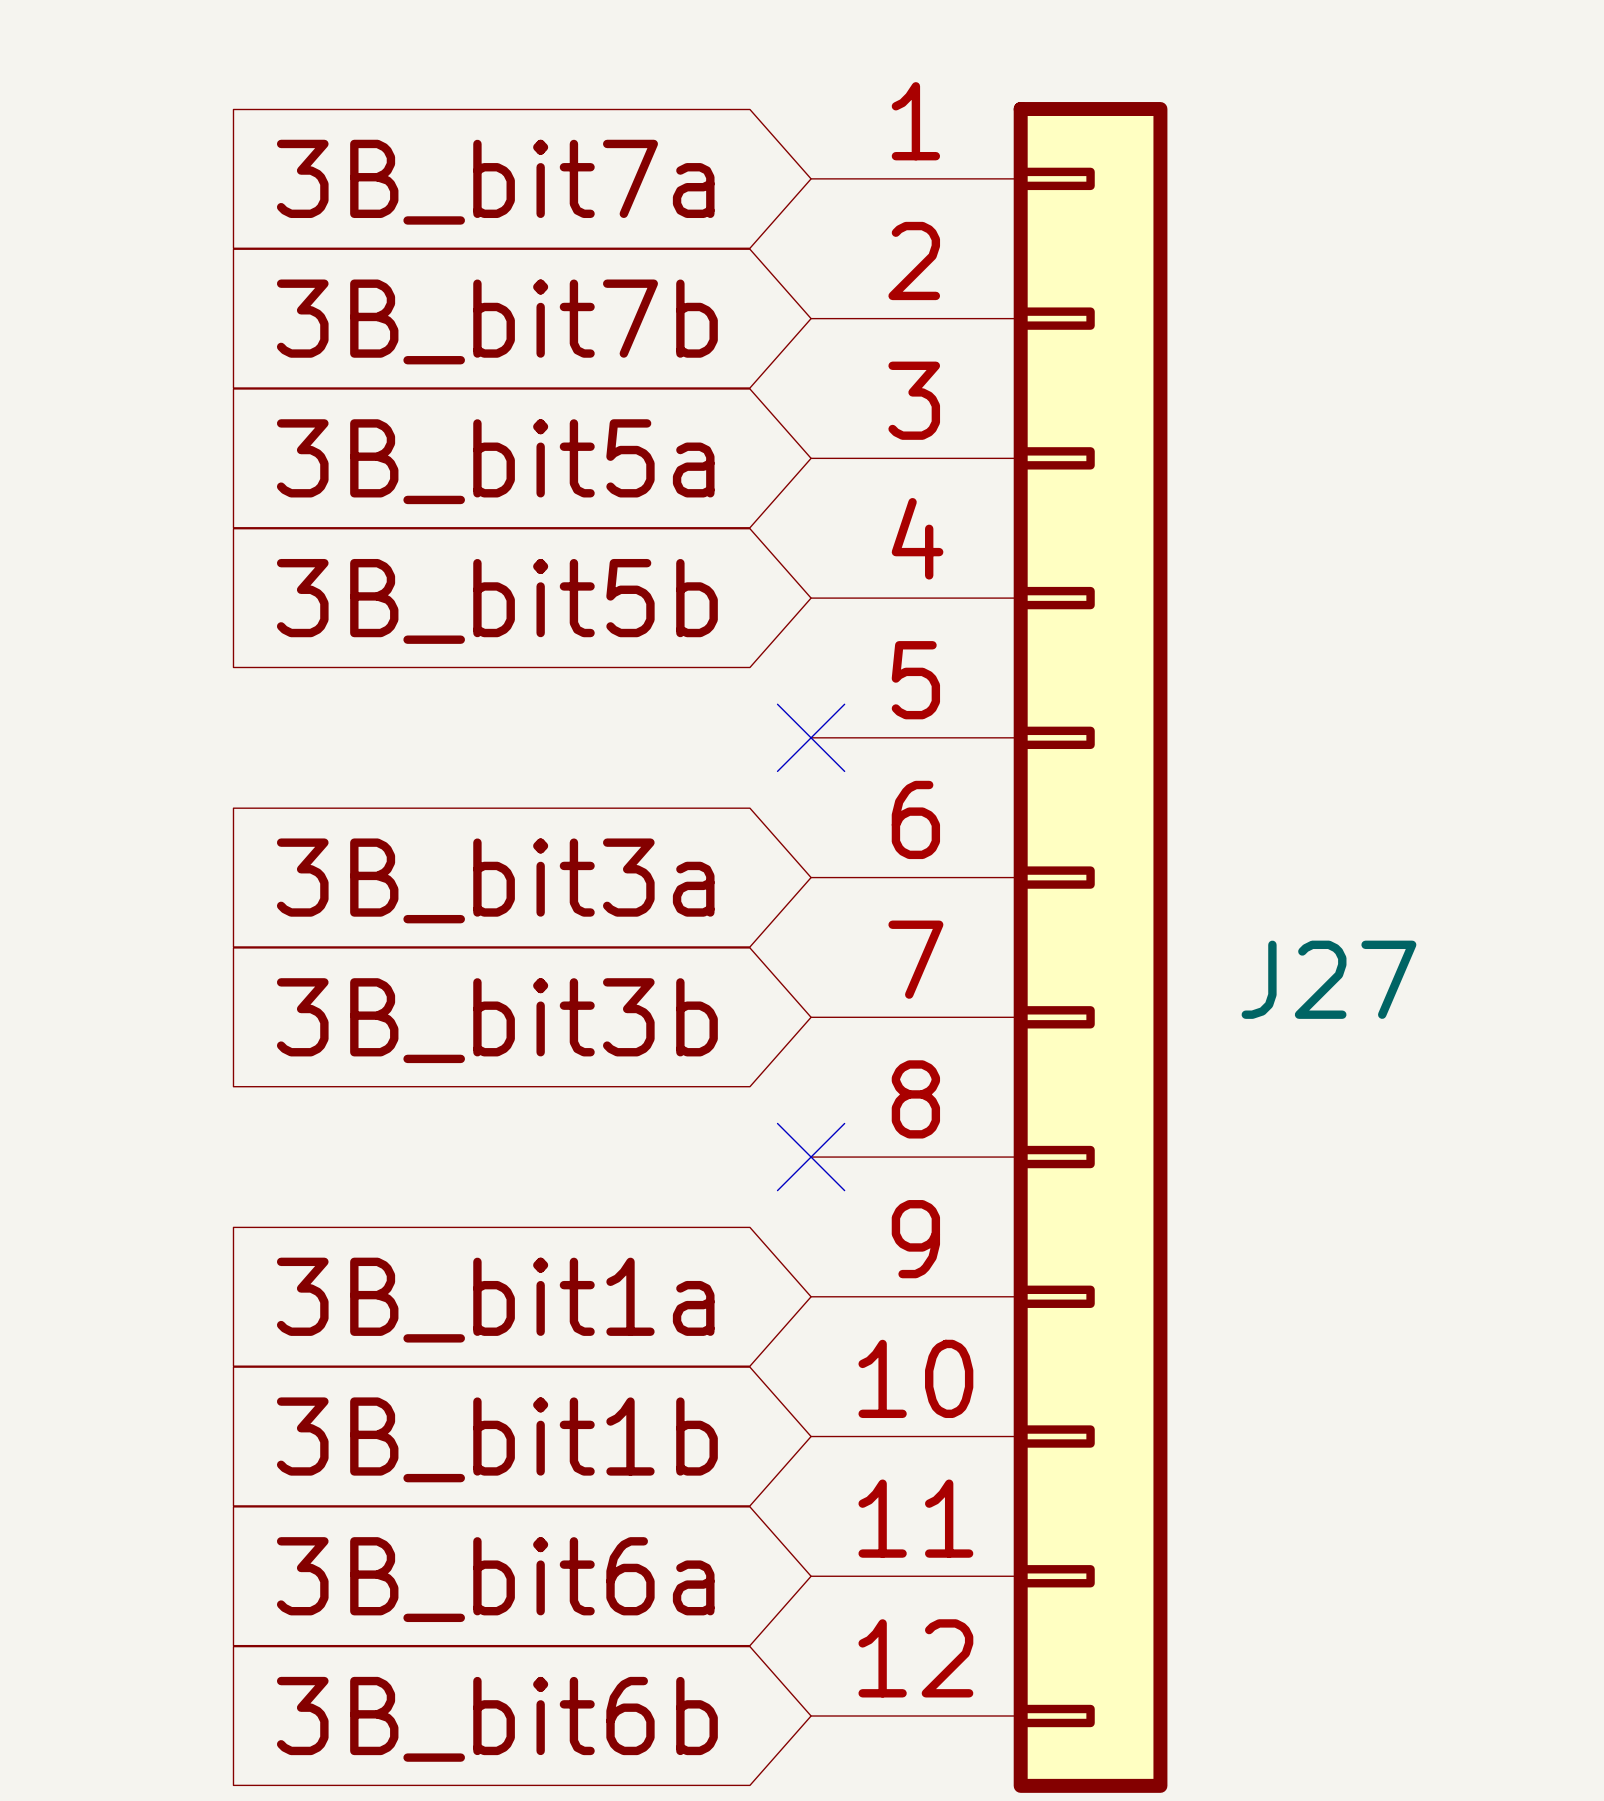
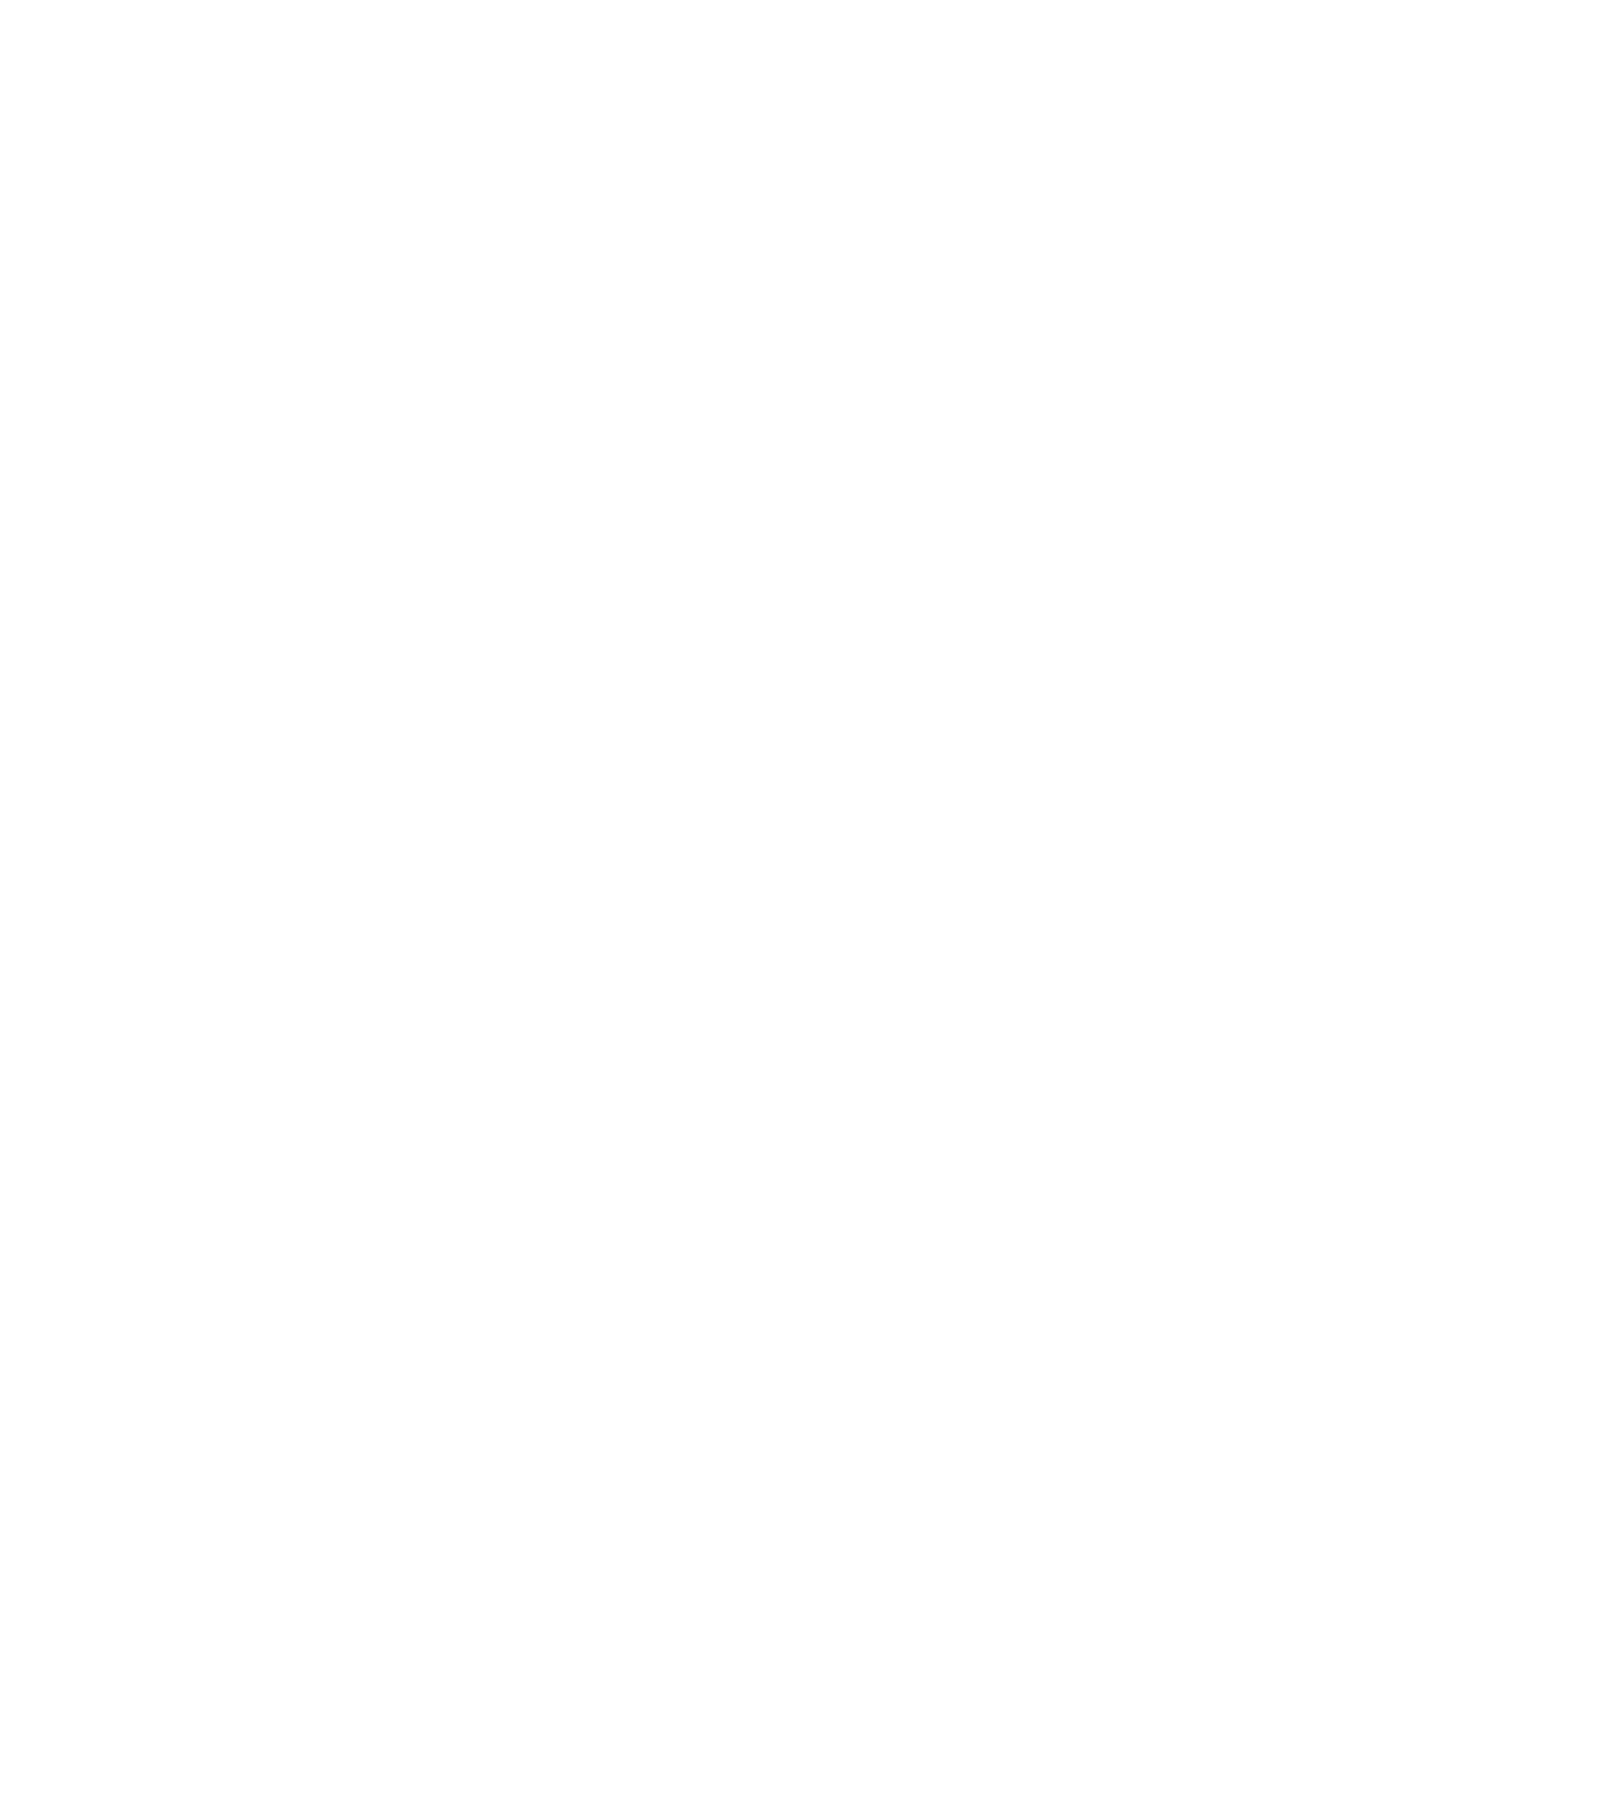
global label: 3B_bit7a (495, 182) -> none
global label: 3B_bit7b (497, 321) -> none
global label: 3B_bit5a (495, 461) -> none
global label: 3B_bit5b (497, 601) -> none
no-connect mark: (811, 737) -> none
global label: 3B_bit3a (495, 880) -> none
J27: (989, 947) -> none
global label: 3B_bit3b (497, 1020) -> none
no-connect mark: (811, 1157) -> none
global label: 3B_bit1a (495, 1300) -> none
global label: 3B_bit1b (497, 1439) -> none
global label: 3B_bit6a (495, 1579) -> none
global label: 3B_bit6b (497, 1719) -> none

